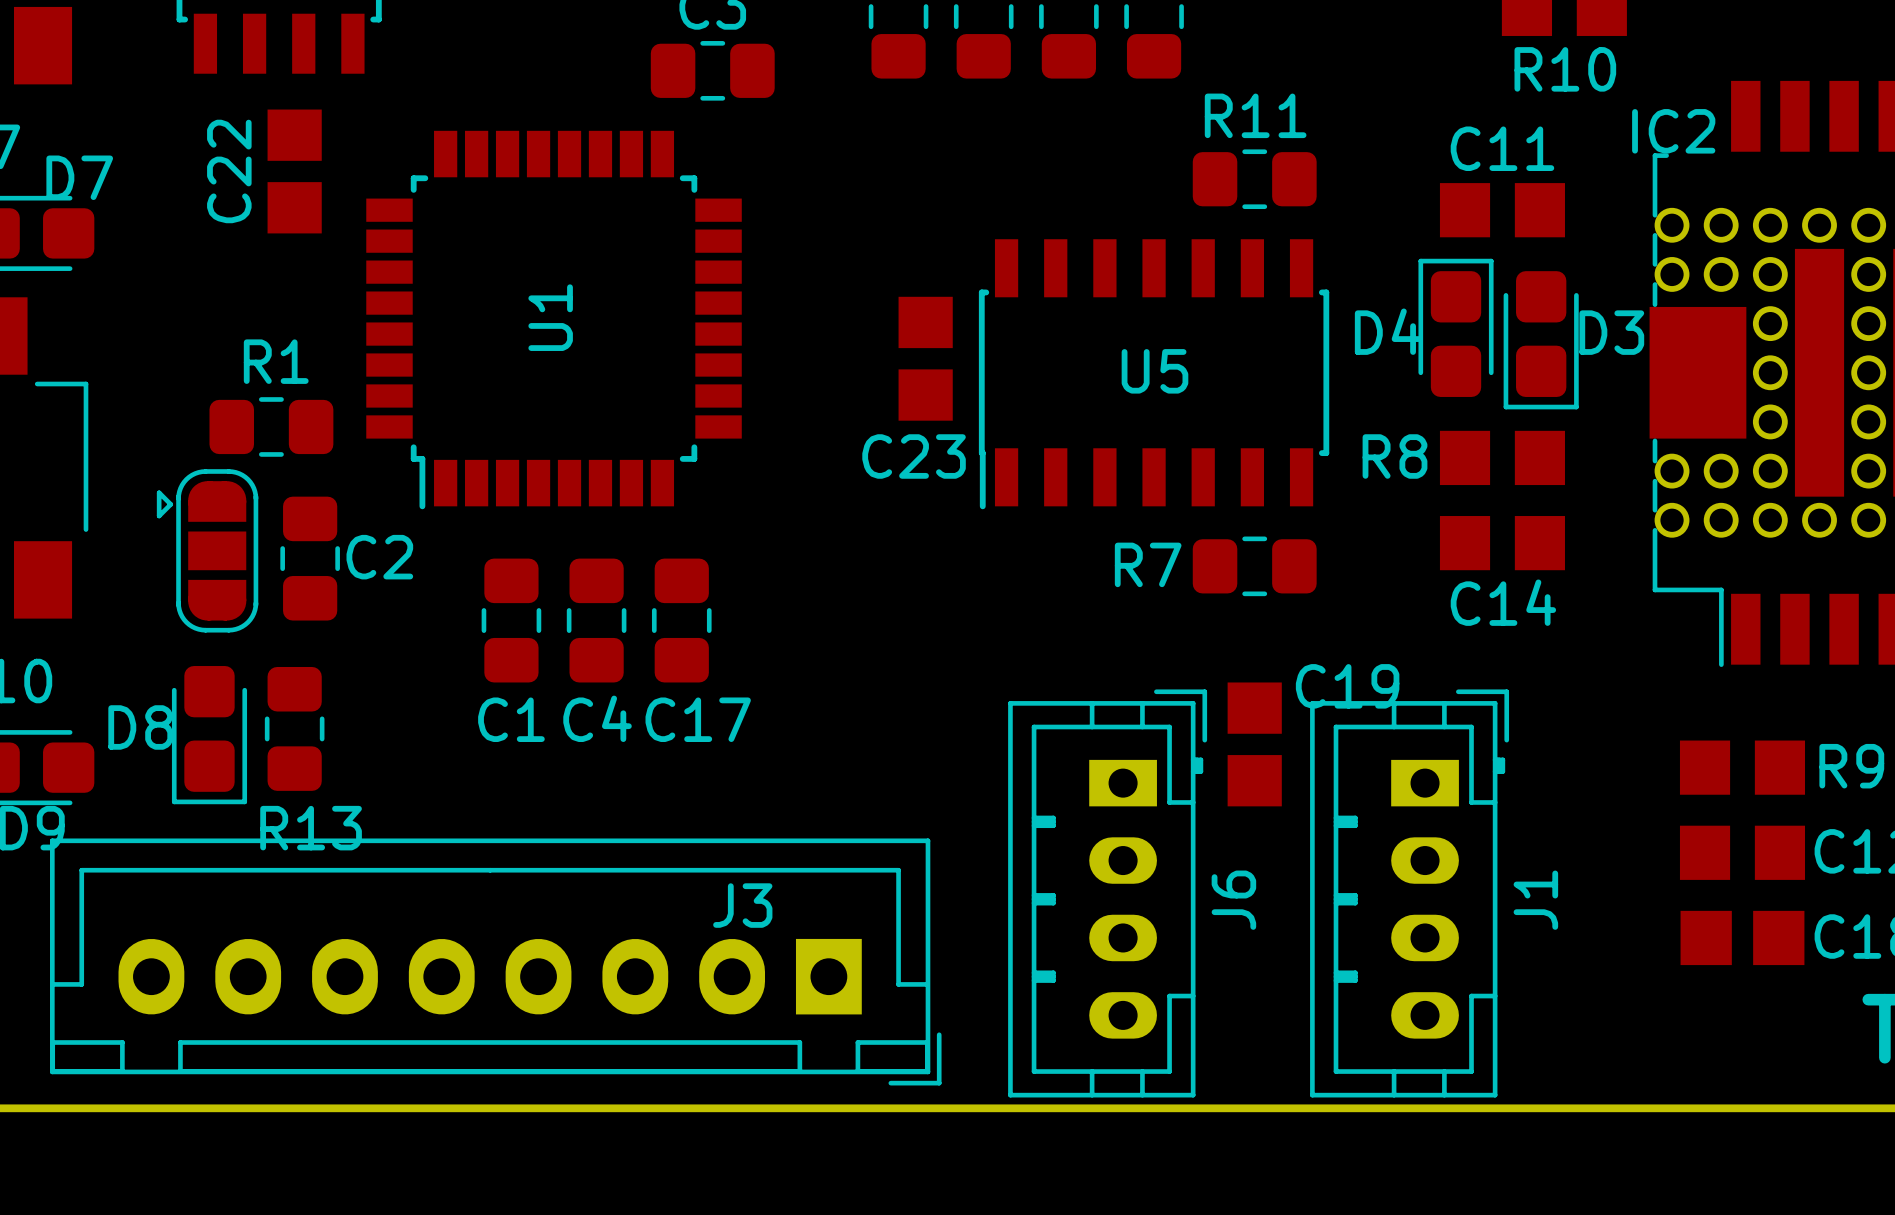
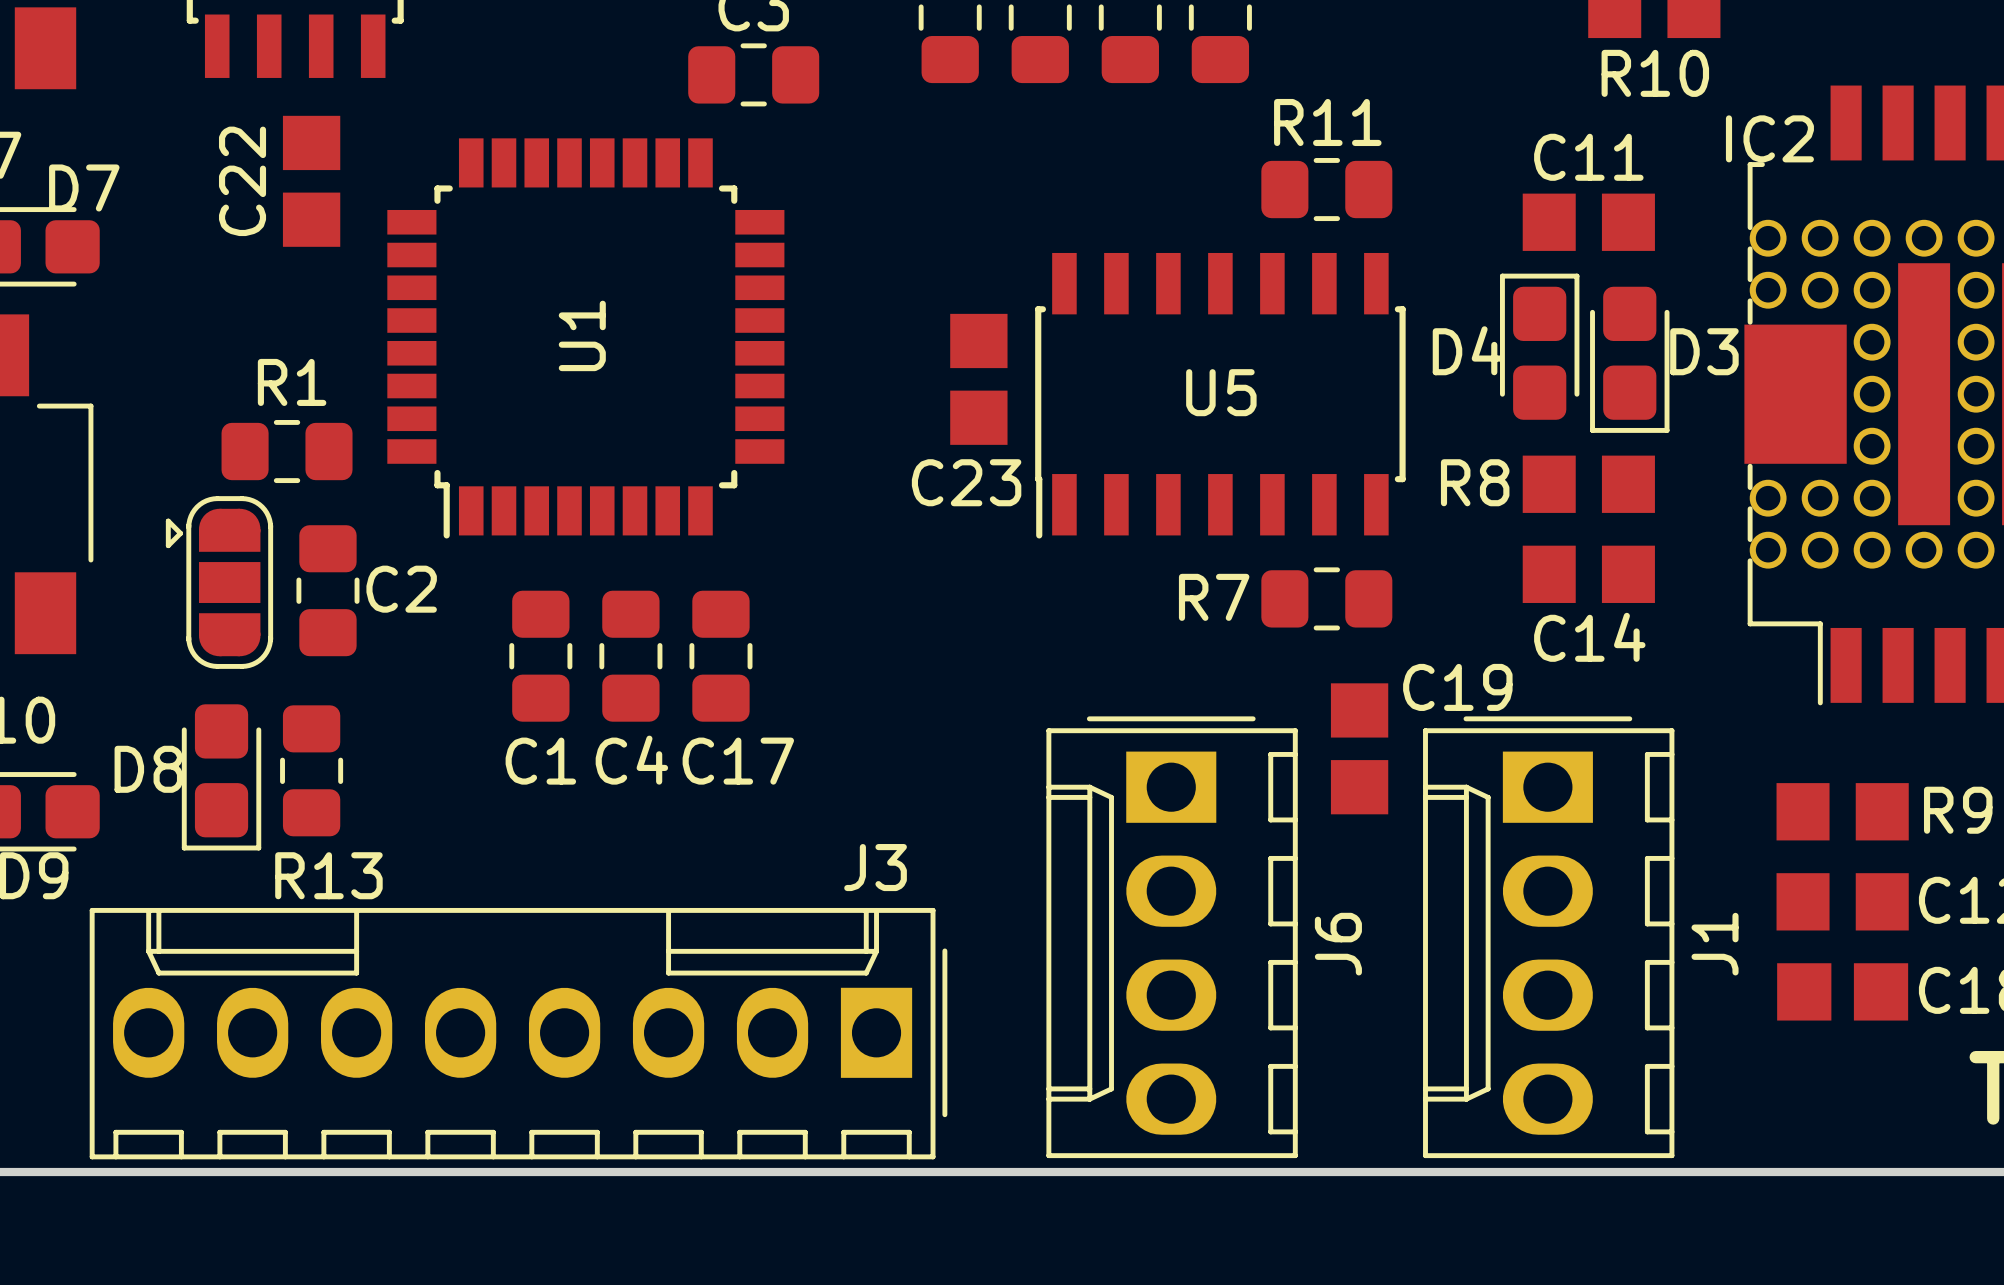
J6 footprint: [1008, 689, 1208, 1098] -> [1046, 716, 1298, 1159]
J1 footprint: [1310, 689, 1510, 1098] -> [1423, 716, 1675, 1159]
C19 position: (1254, 744) -> (1359, 748)
J3 footprint: [49, 838, 942, 1086] -> [89, 907, 948, 1160]
J3 name position: J3 (742, 905) -> J3 (875, 867)

